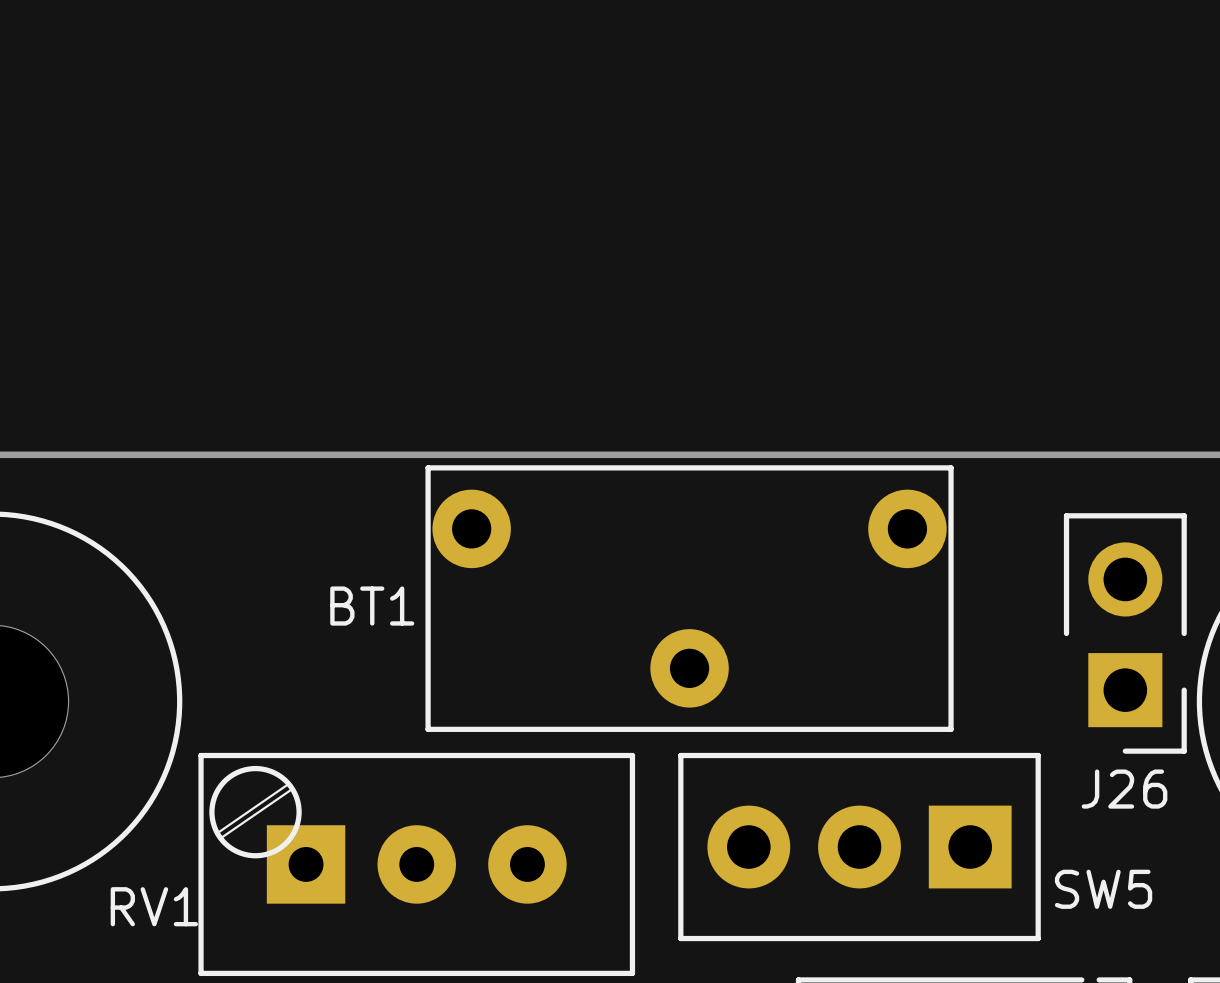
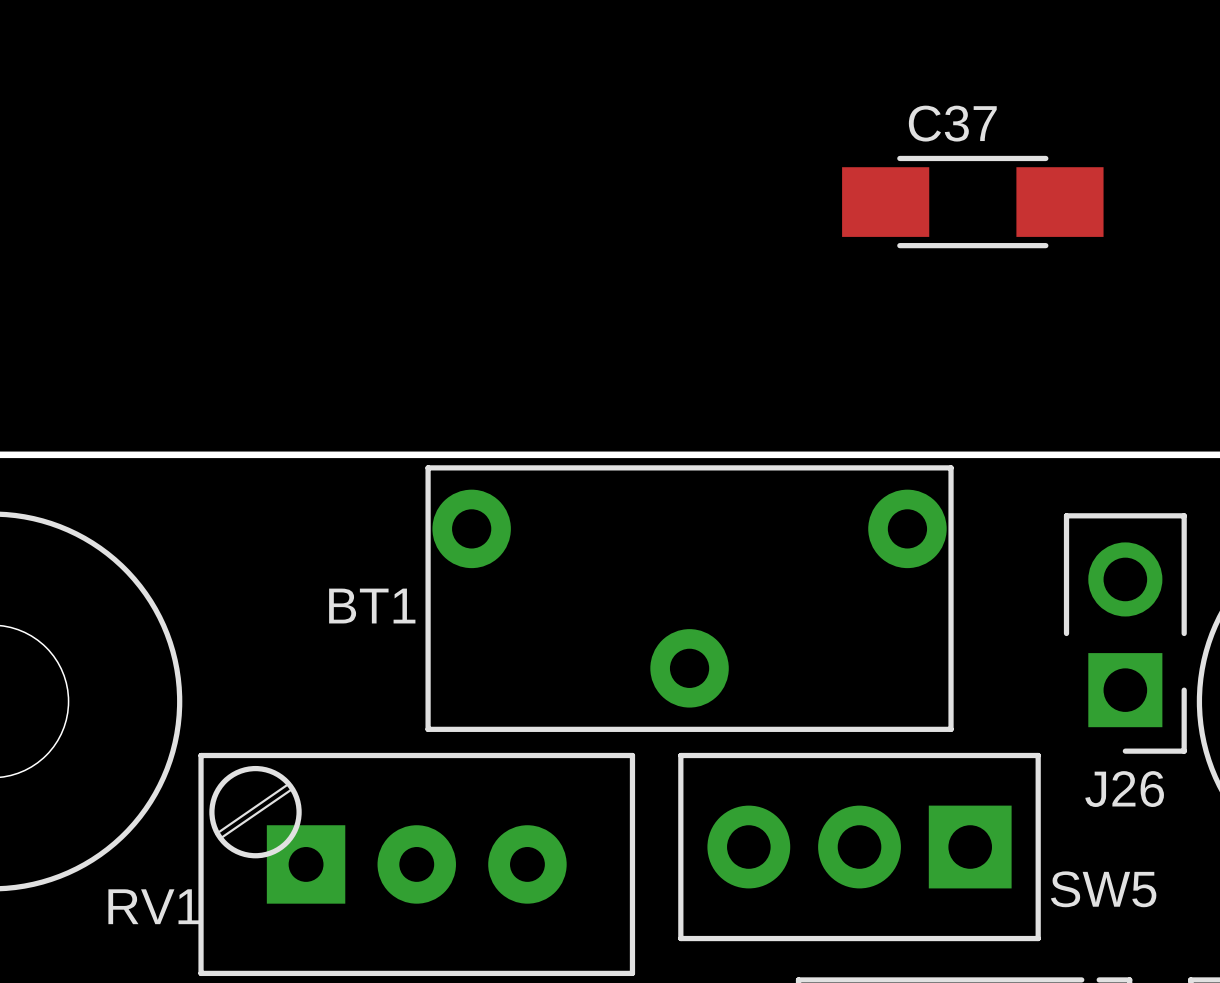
C37: none -> (972, 202)

